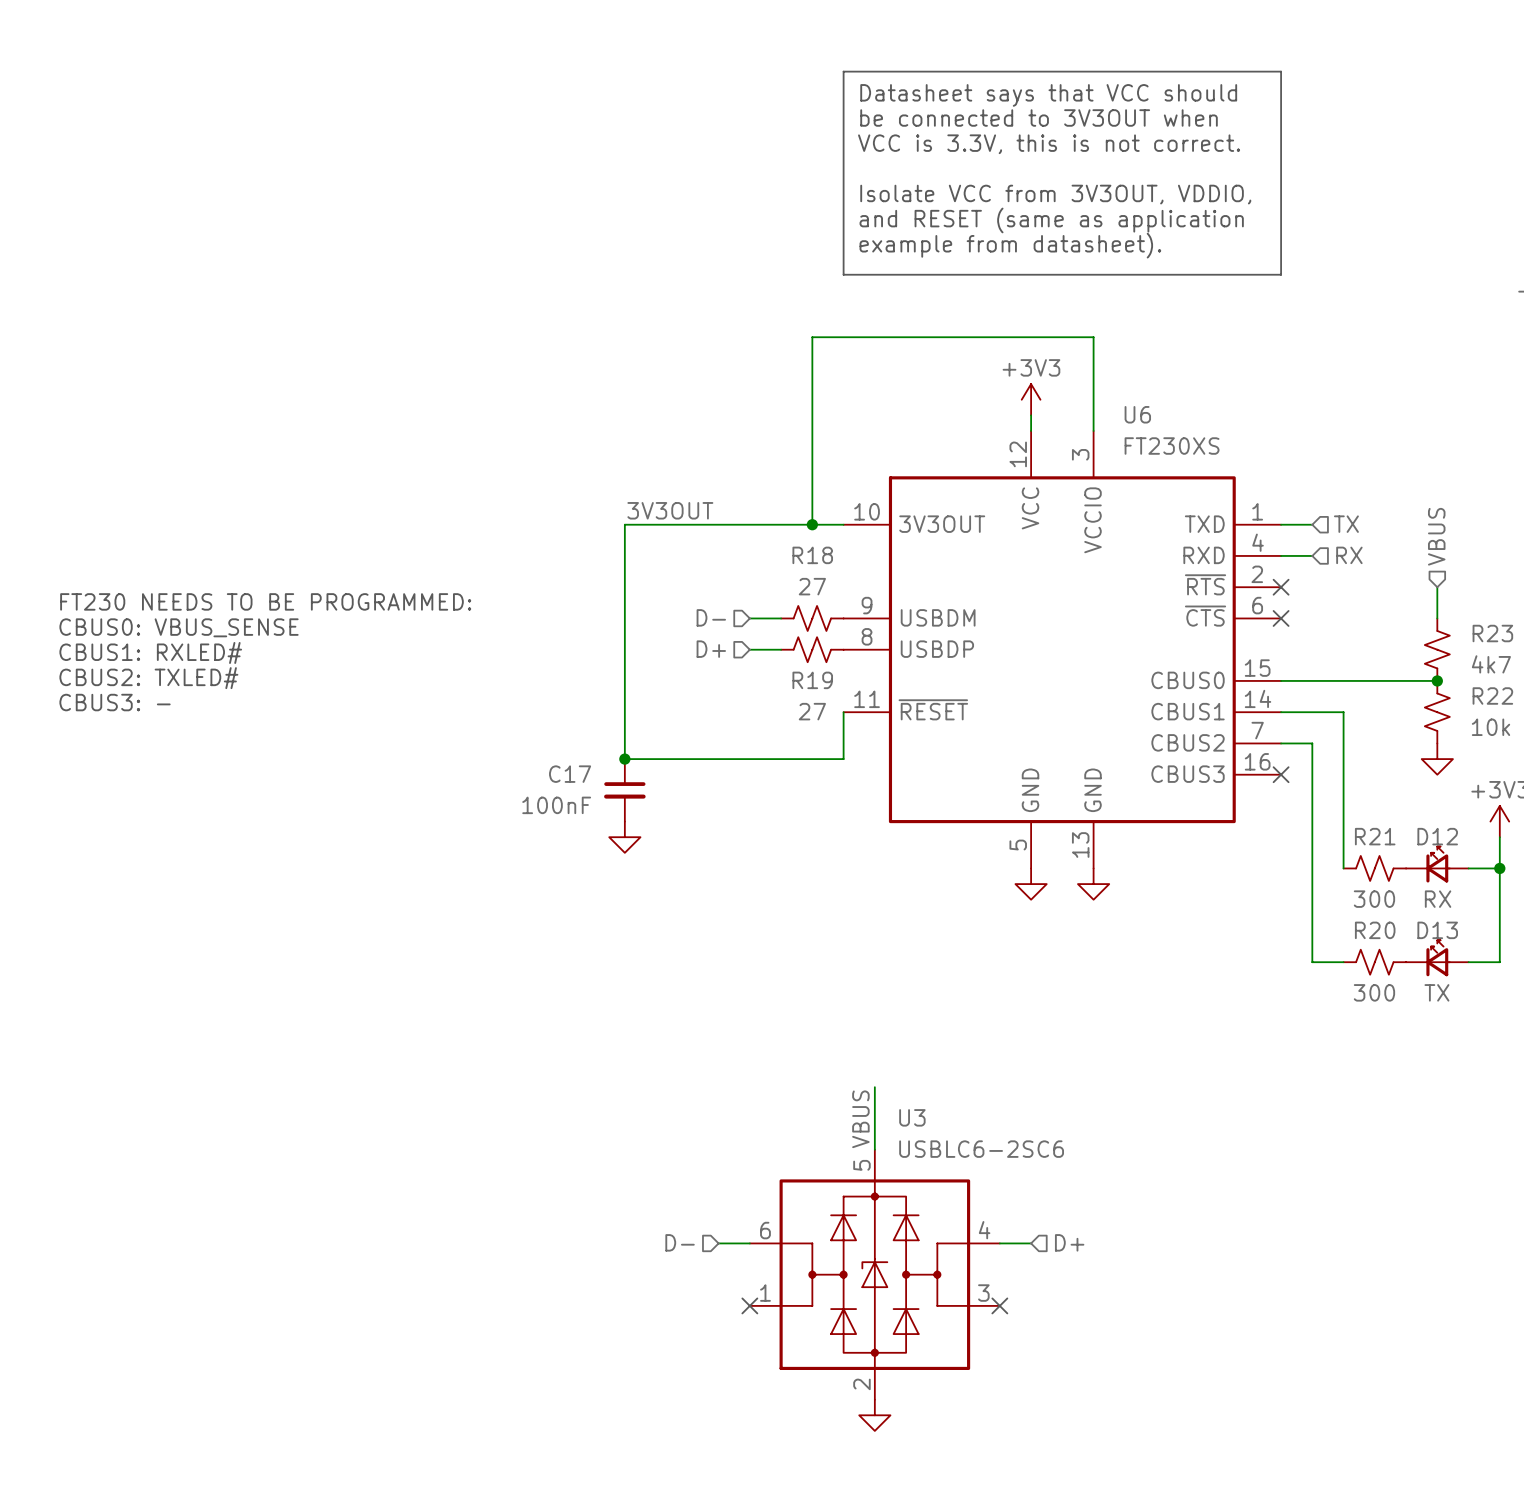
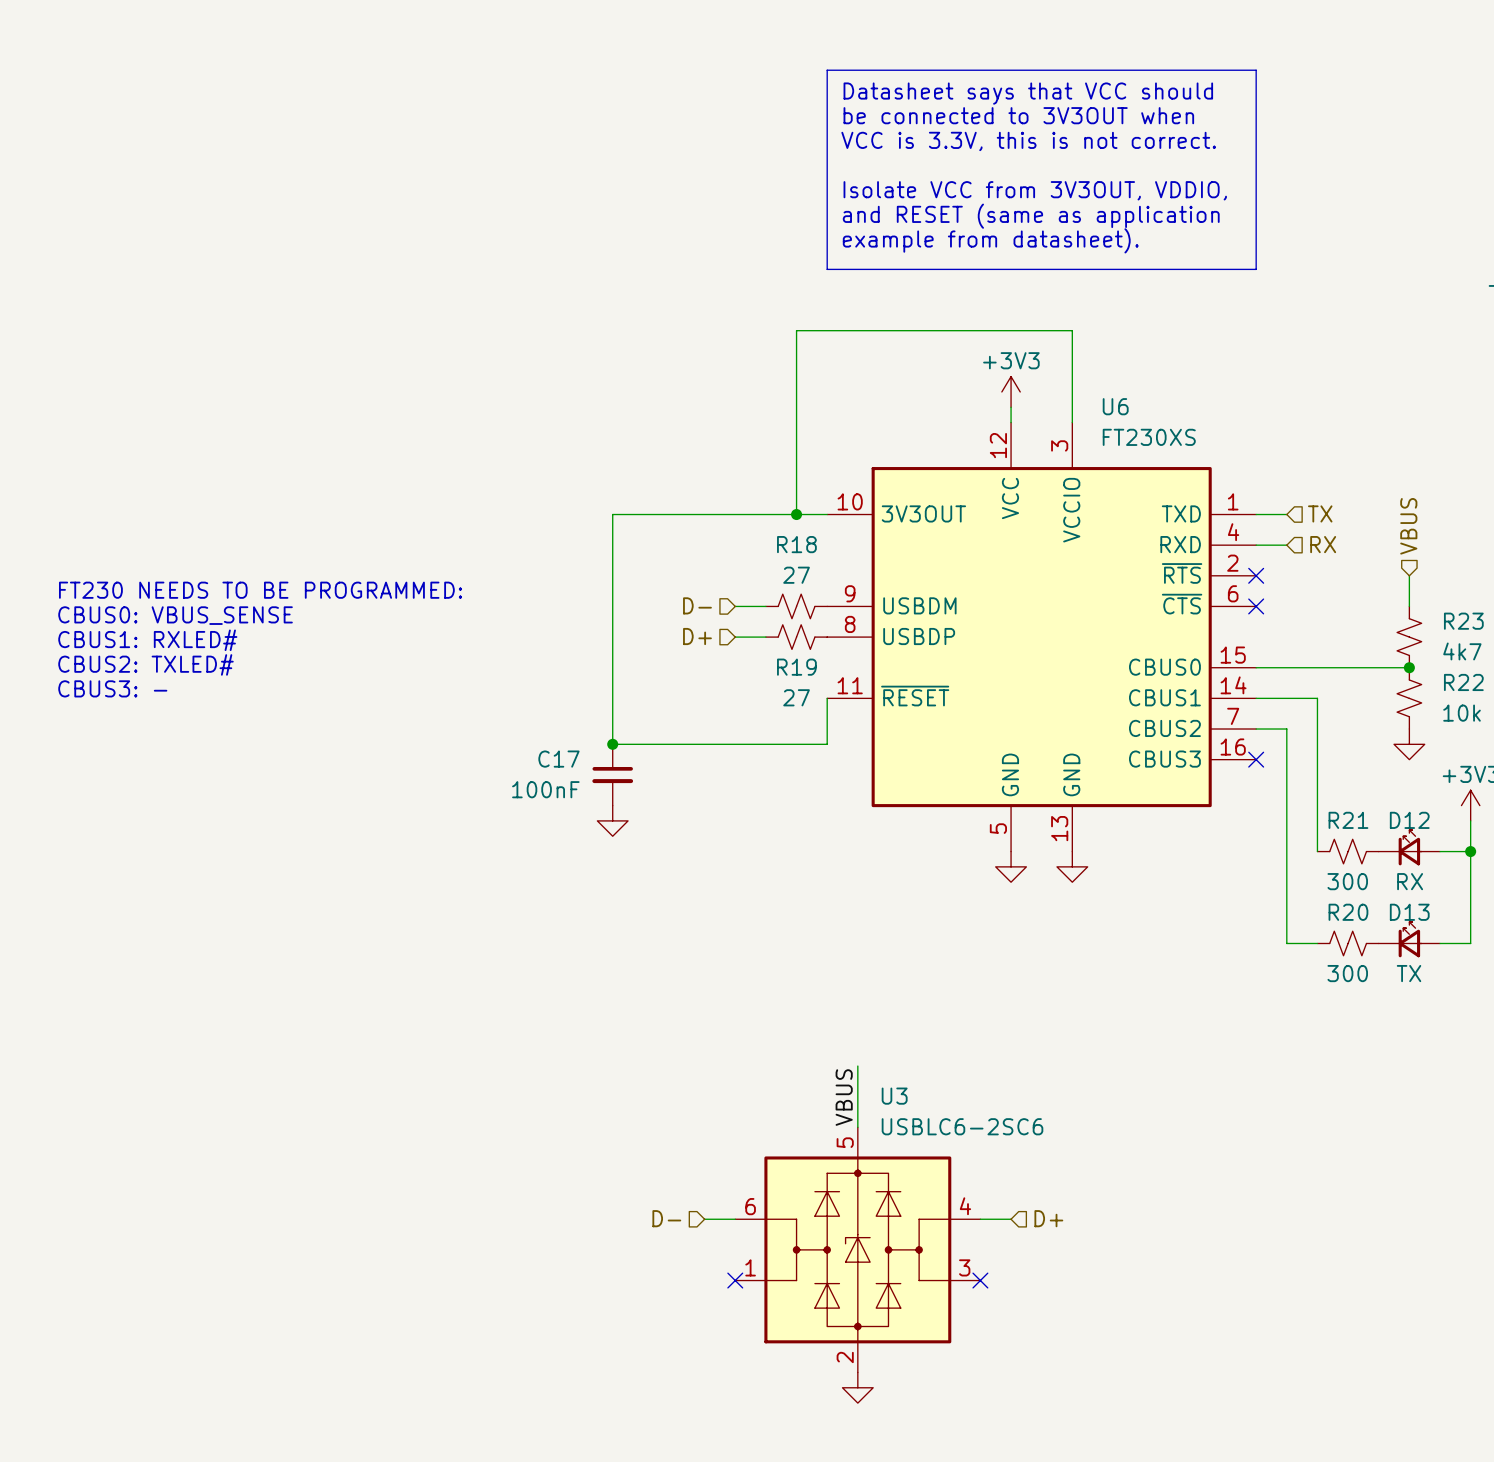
label: 3V3OUT (670, 510) -> none

